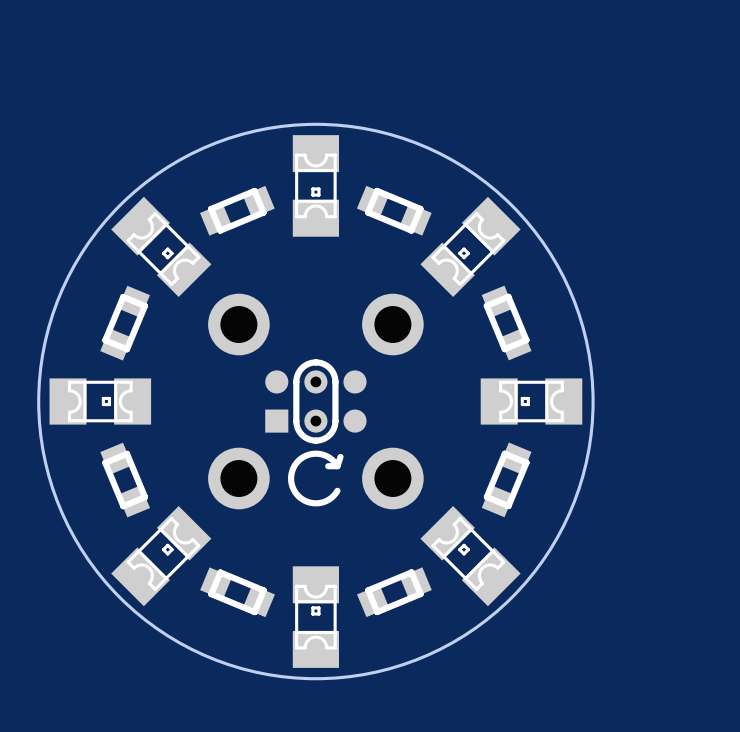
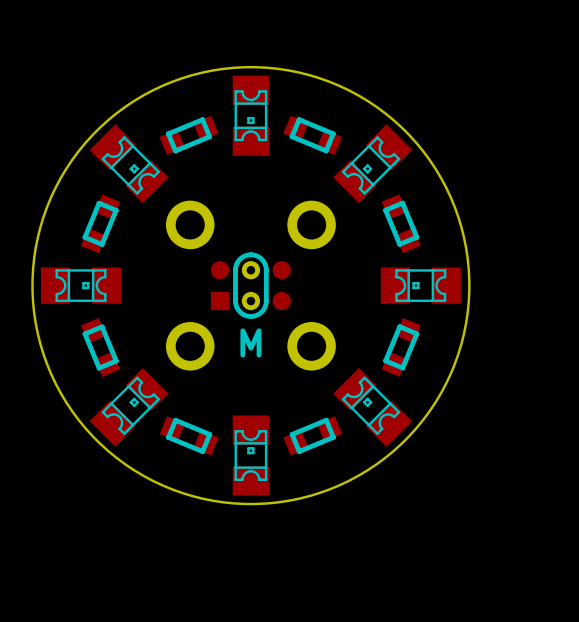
line: (340, 456) (337, 466) (328, 466) -> none
line: (334, 462) (321, 454) (306, 455) (294, 465) (291, 480) (297, 494) (310, 502) (326, 501) (337, 490) -> none
text: none -> M (250, 342)

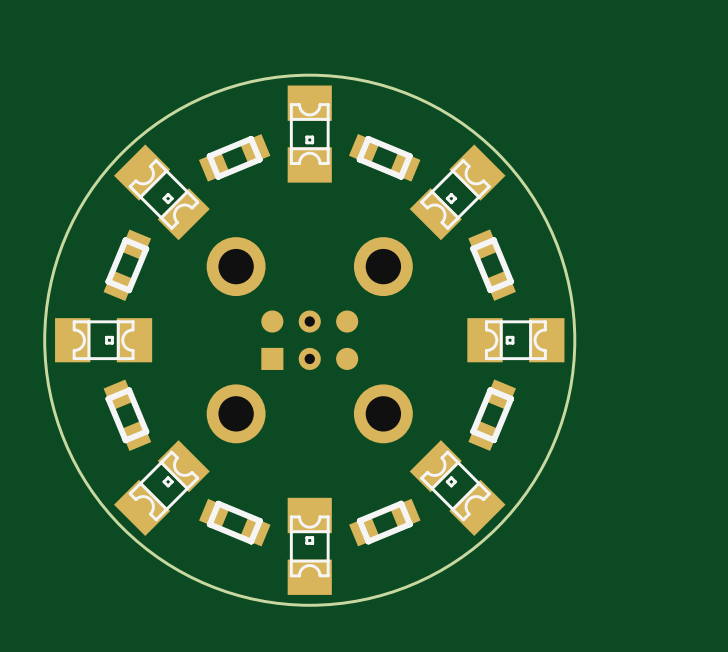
part footprint: [210, 252, 291, 319] -> [261, 310, 359, 370]
text: M (250, 342) -> none

